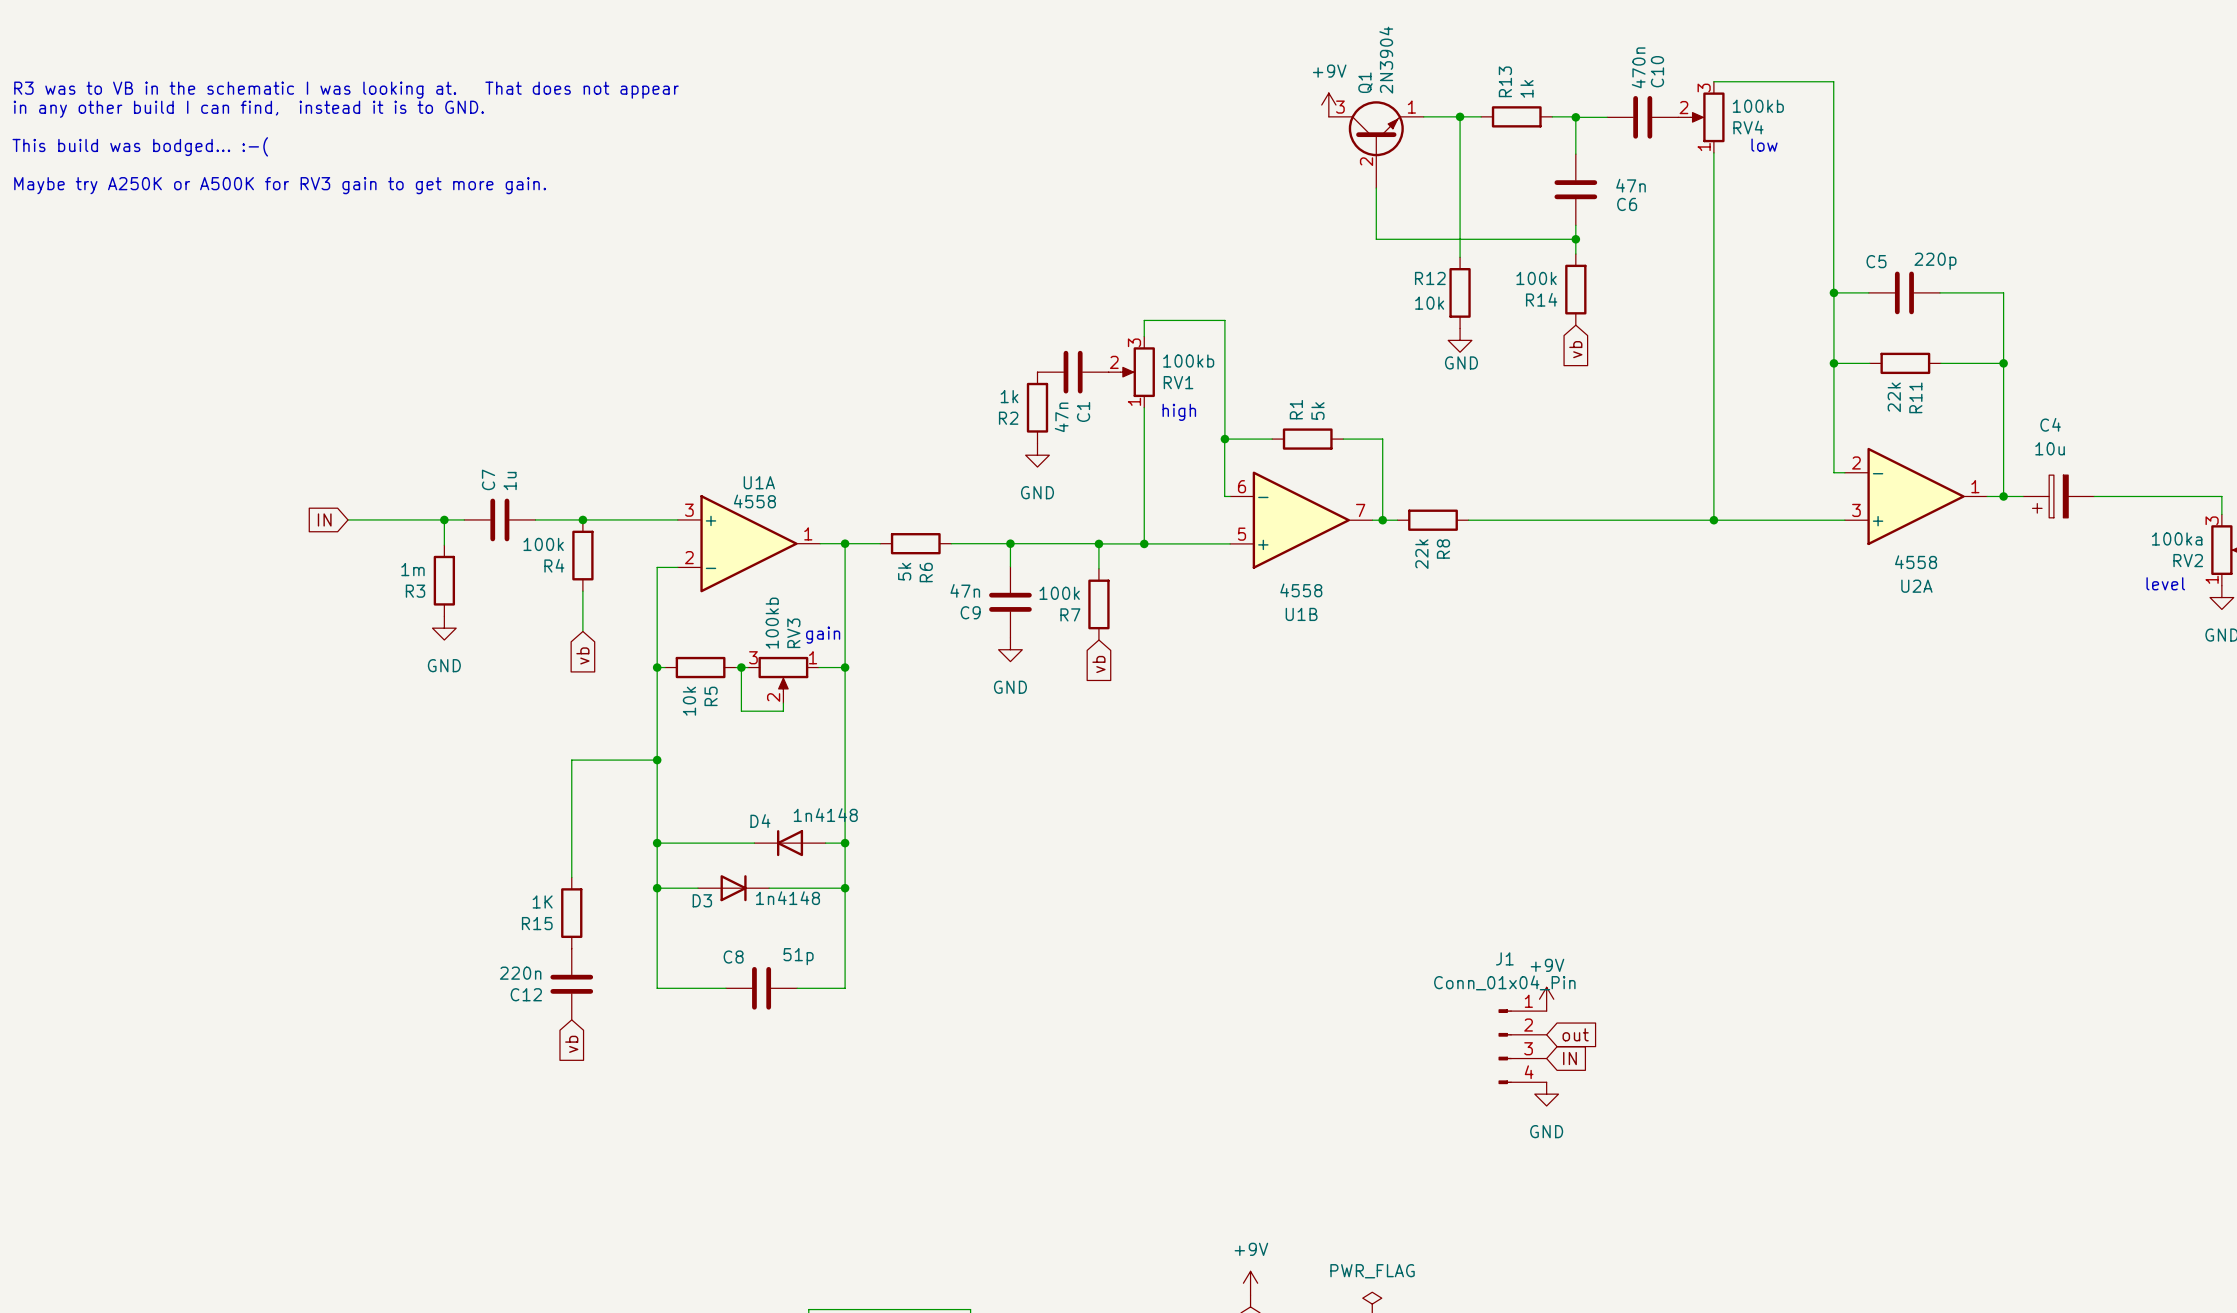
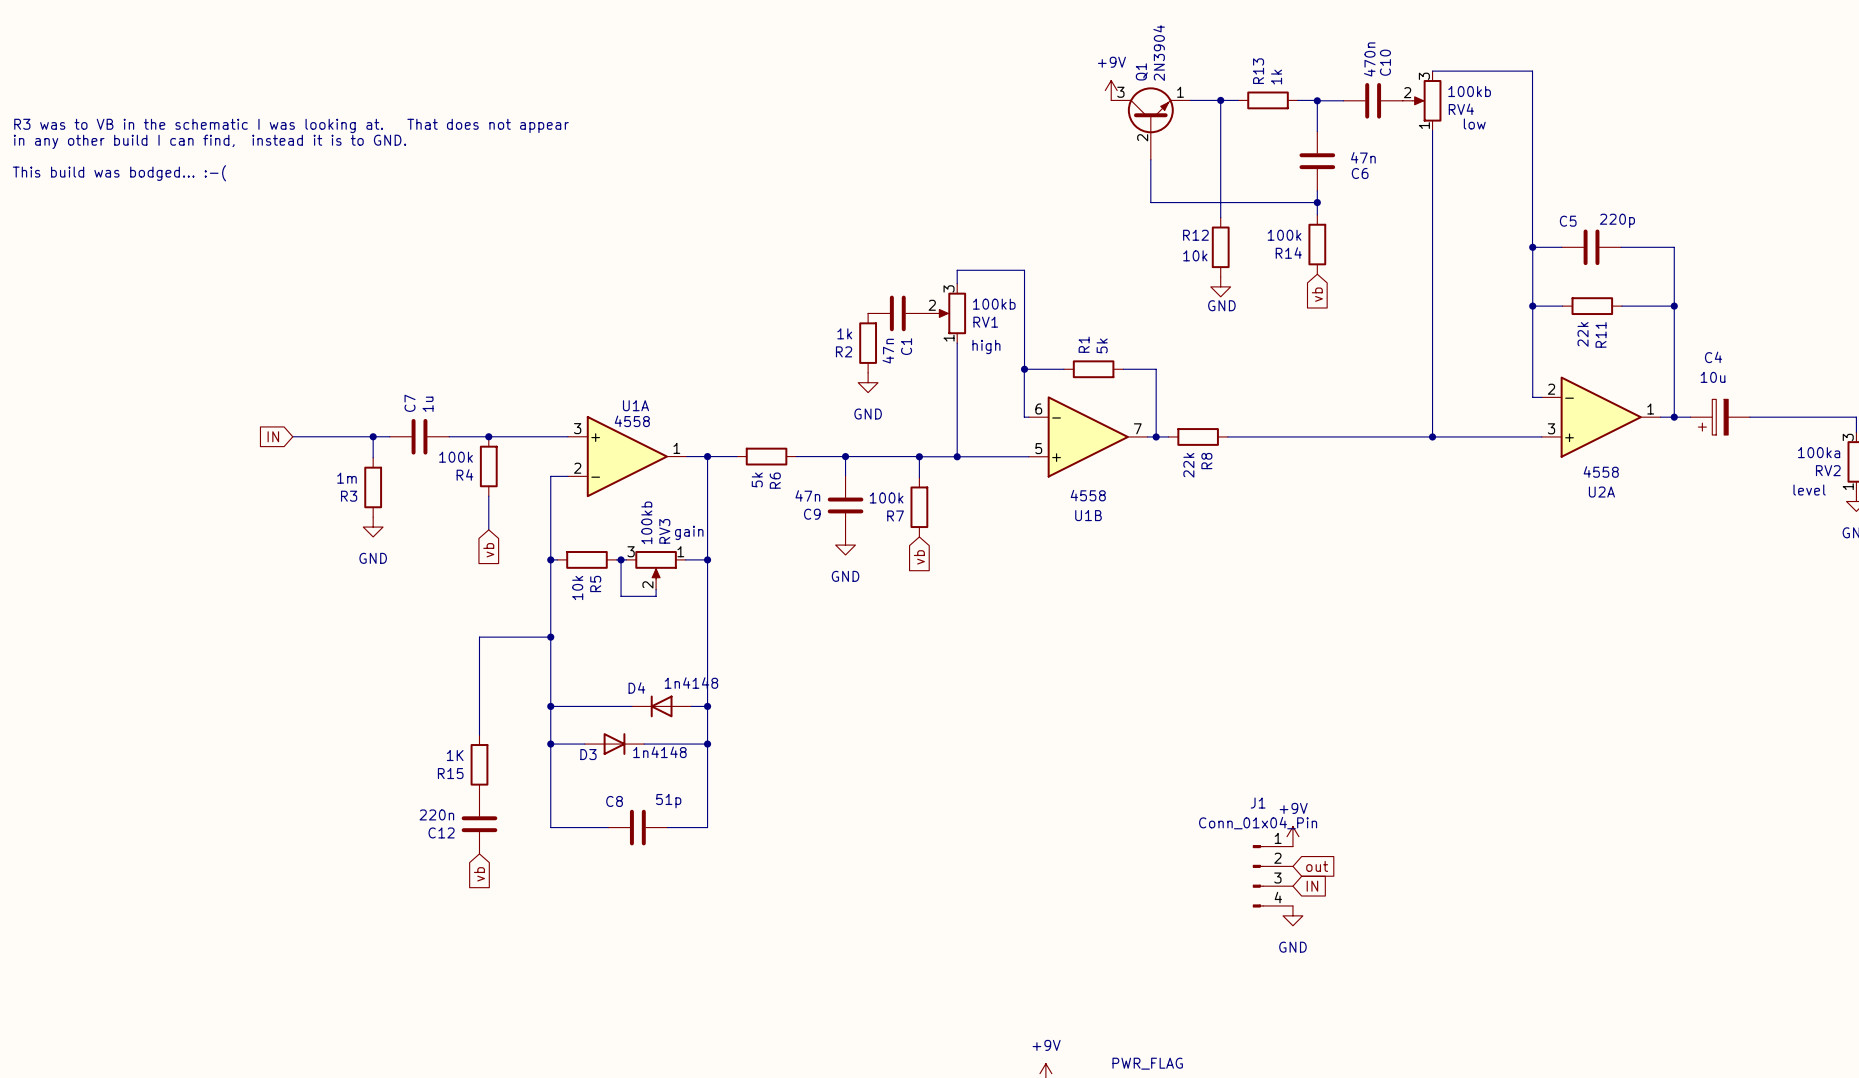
text: R3 was to VB in the schematic I was looking at. That does not appear (346, 90) -> none
text position: in any other build I can find, instead it is to GND. (248, 109) -> in any other build I can find, instead it is to GND. (209, 141)
text: This build was bodged... :-( (140, 146) -> R3 was to VB in the schematic I was looking at. That does not appear (291, 125)
text: Maybe try A250K or A500K for RV3 gain to get more gain. (280, 185) -> none
text: none -> This build was bodged... :-( (119, 173)

